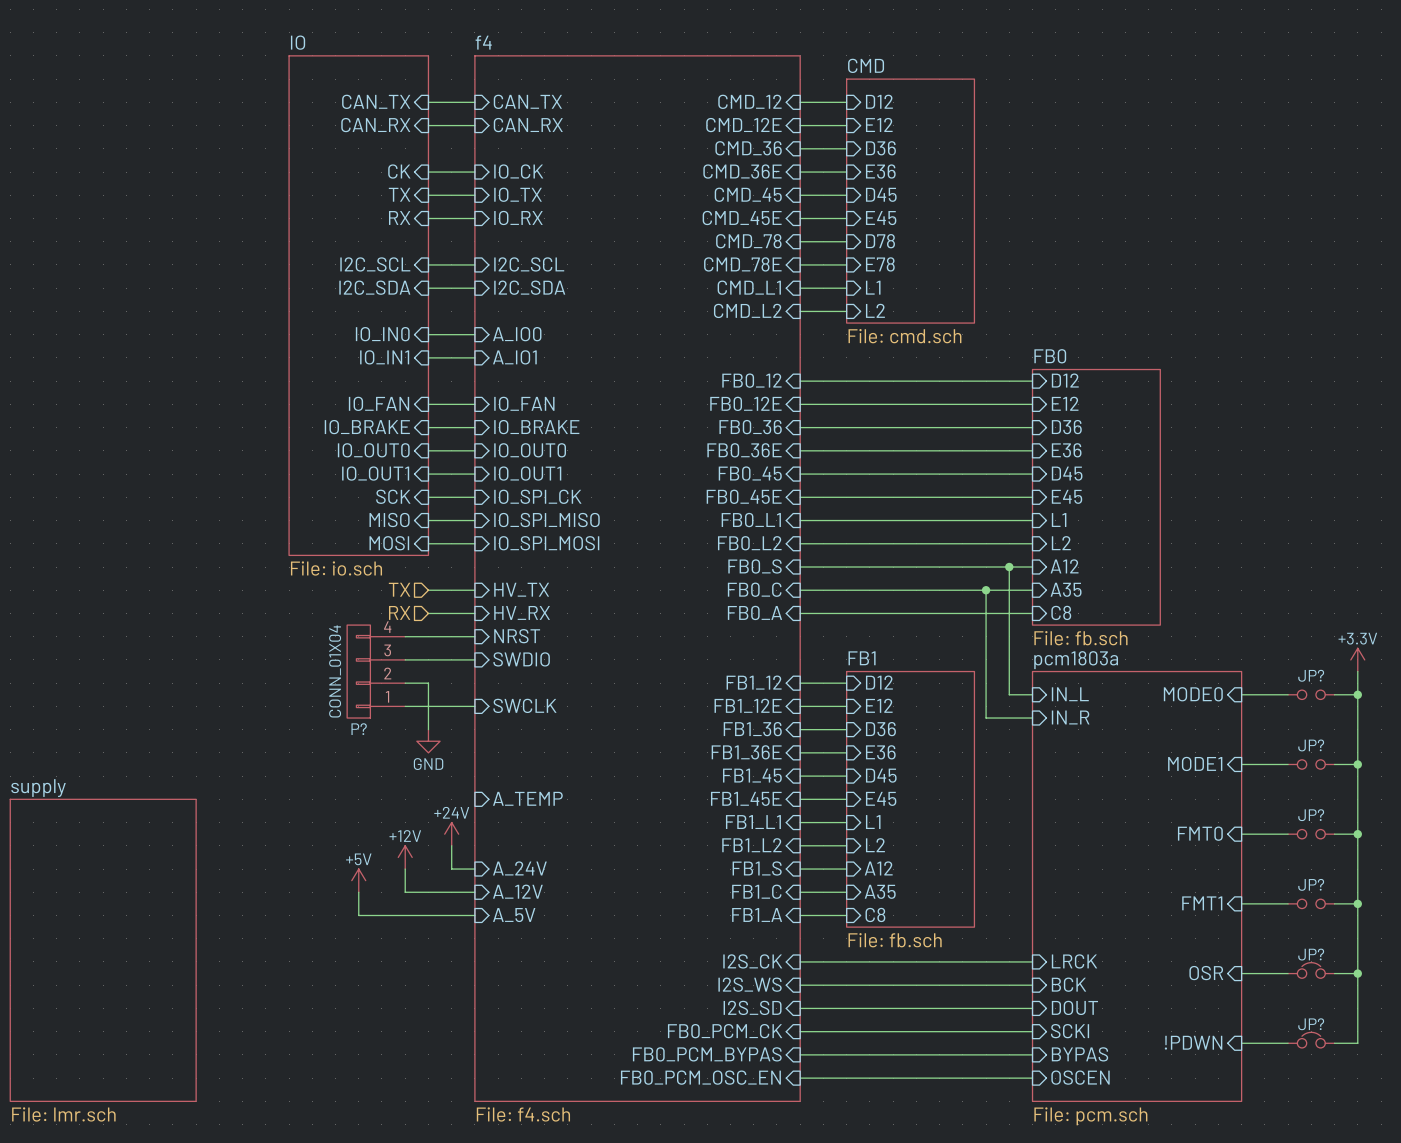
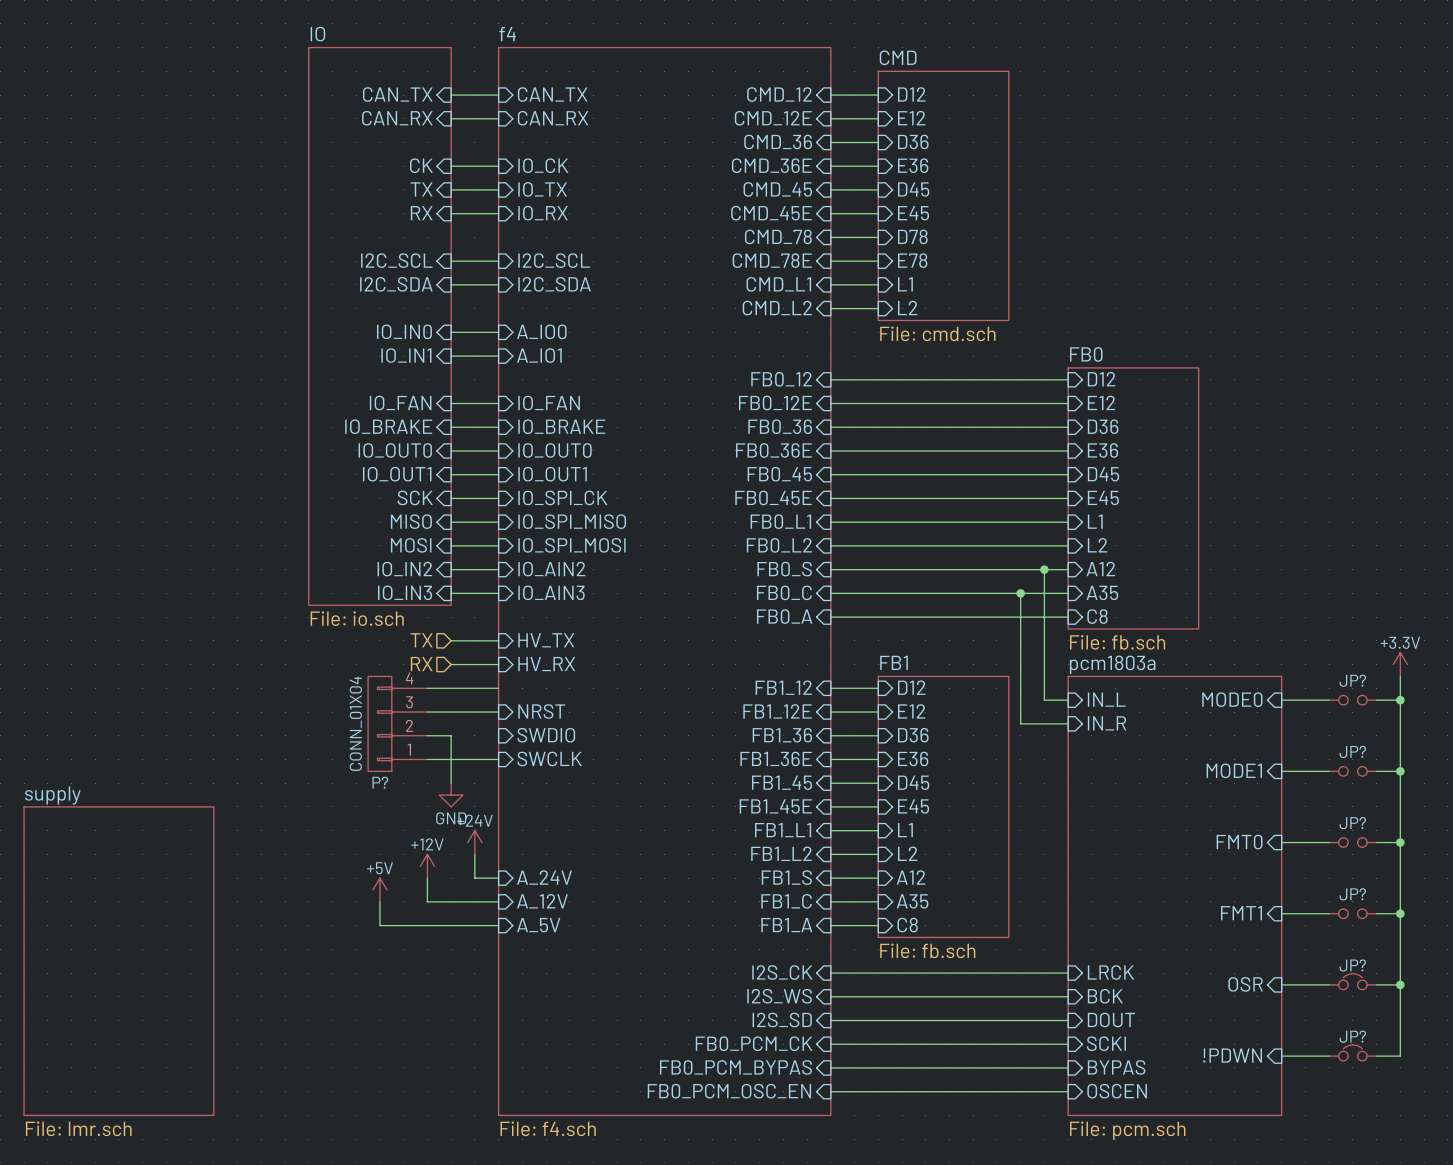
sheet IO: File: io.sch (358, 305) -> none
sheet IO: none -> File: io.sch (379, 326)
sheet pin: none -> IO_IN2 (404, 569)
sheet pin: none -> IO_AIN2 (551, 569)
sheet pin: none -> IO_IN3 (405, 592)
hierarchical label position: TX (399, 589) -> TX (421, 640)
sheet pin: HV_TX (521, 589) -> IO_AIN3 (551, 592)
hierarchical label position: RX (399, 612) -> RX (421, 664)
sheet pin: HV_RX (522, 612) -> none
wire: (428, 613) (474, 613) -> (451, 569) (498, 569)
wire: (405, 636) (428, 636) -> none
sheet pin: NRST (517, 636) -> HV_TX (546, 640)
wire: (405, 659) (428, 659) -> none
sheet pin: SWDIO (521, 659) -> HV_RX (546, 664)
P? position: (376, 671) -> (397, 723)
wire: (428, 683) (428, 729) -> (451, 688) (498, 688)
sheet pin: SWCLK (524, 705) -> NRST (541, 711)
wire: none -> (427, 735) (451, 735) (451, 783)
sheet pin: none -> SWDIO (546, 735)
power symbol position: GND (428, 741) -> GND (451, 795)
wire: none -> (427, 759) (498, 759)
sheet pin: none -> SWCLK (549, 758)
sheet pin: A_TEMP (527, 798) -> none

